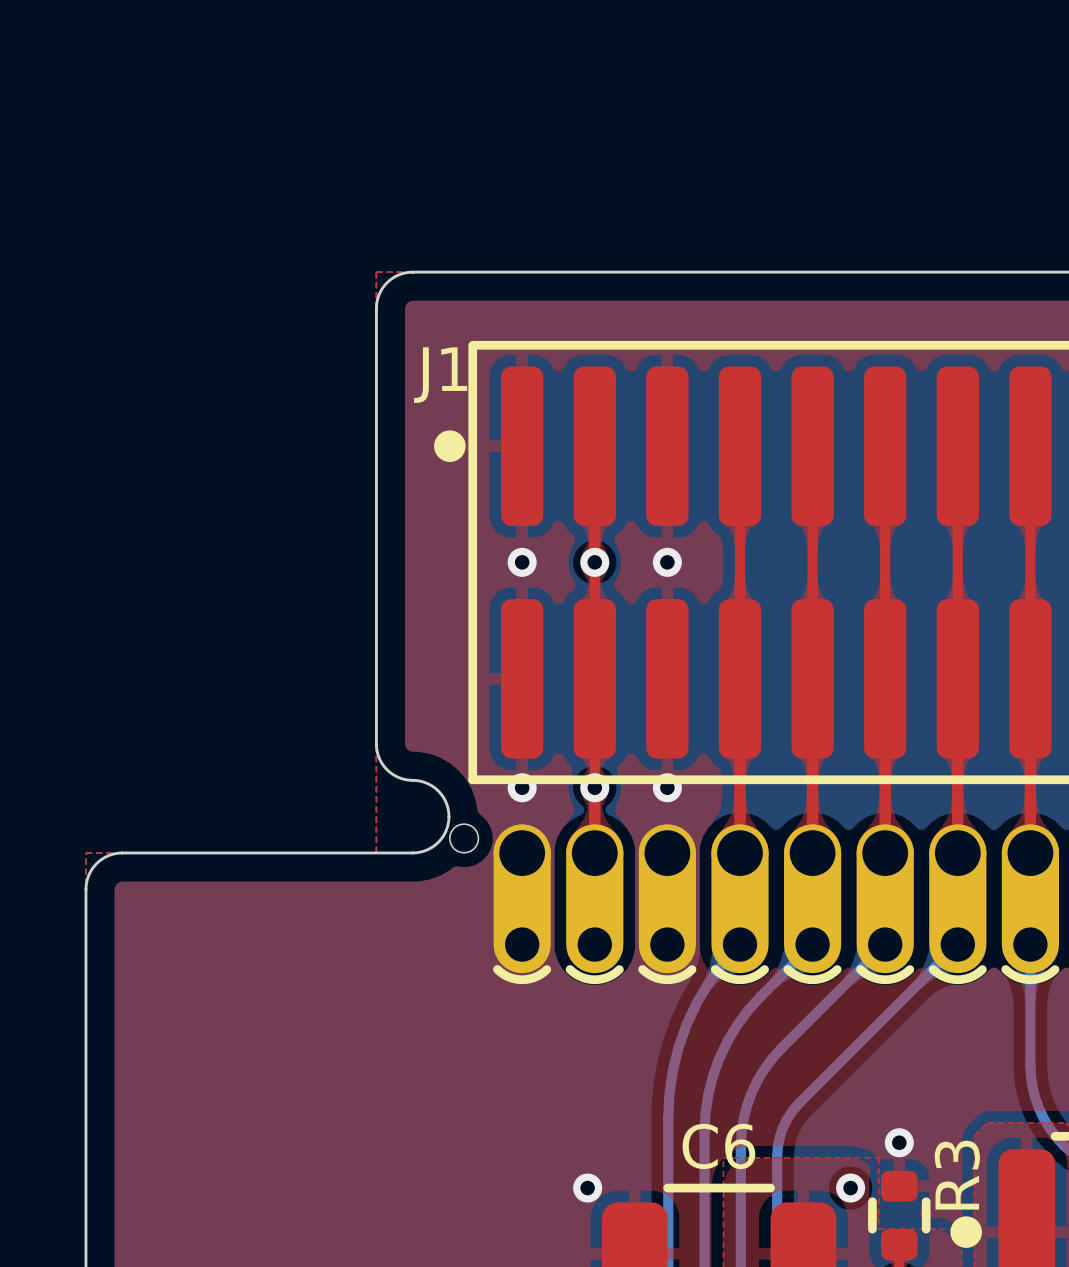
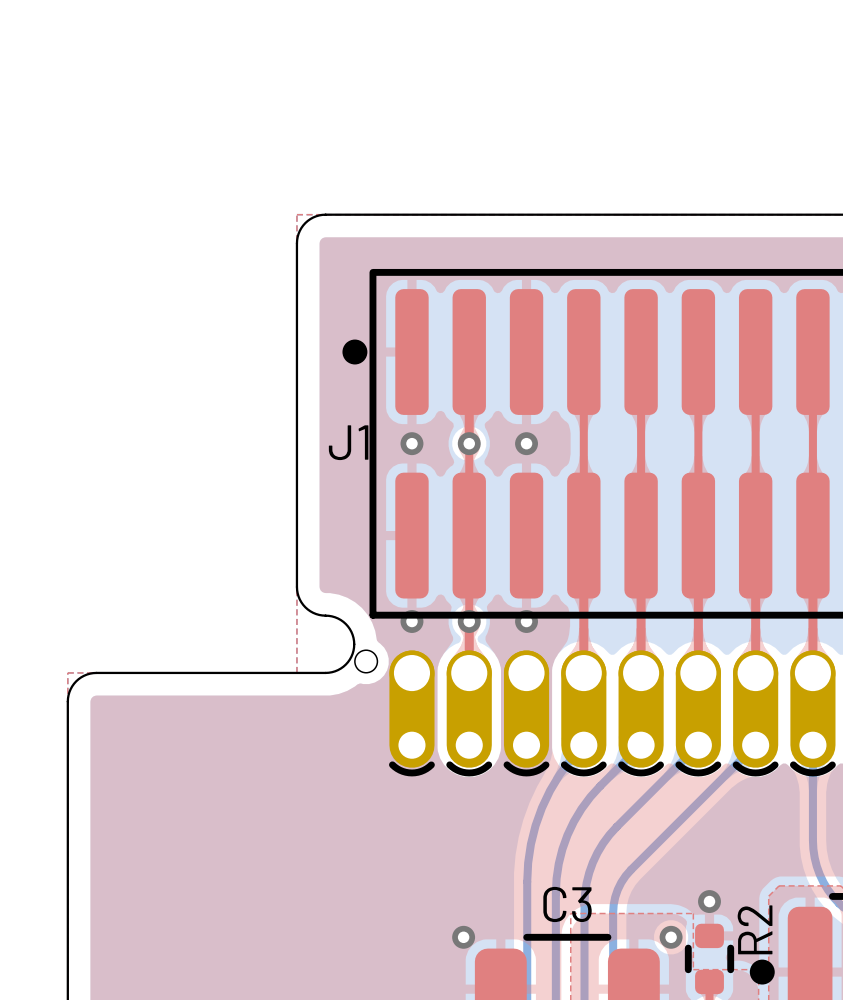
J1 name position: J1 (440, 375) -> J1 (348, 442)
C6 name: C6 (718, 1146) -> C3 (567, 904)
R3 name: R3 (957, 1175) -> R2 (755, 929)

